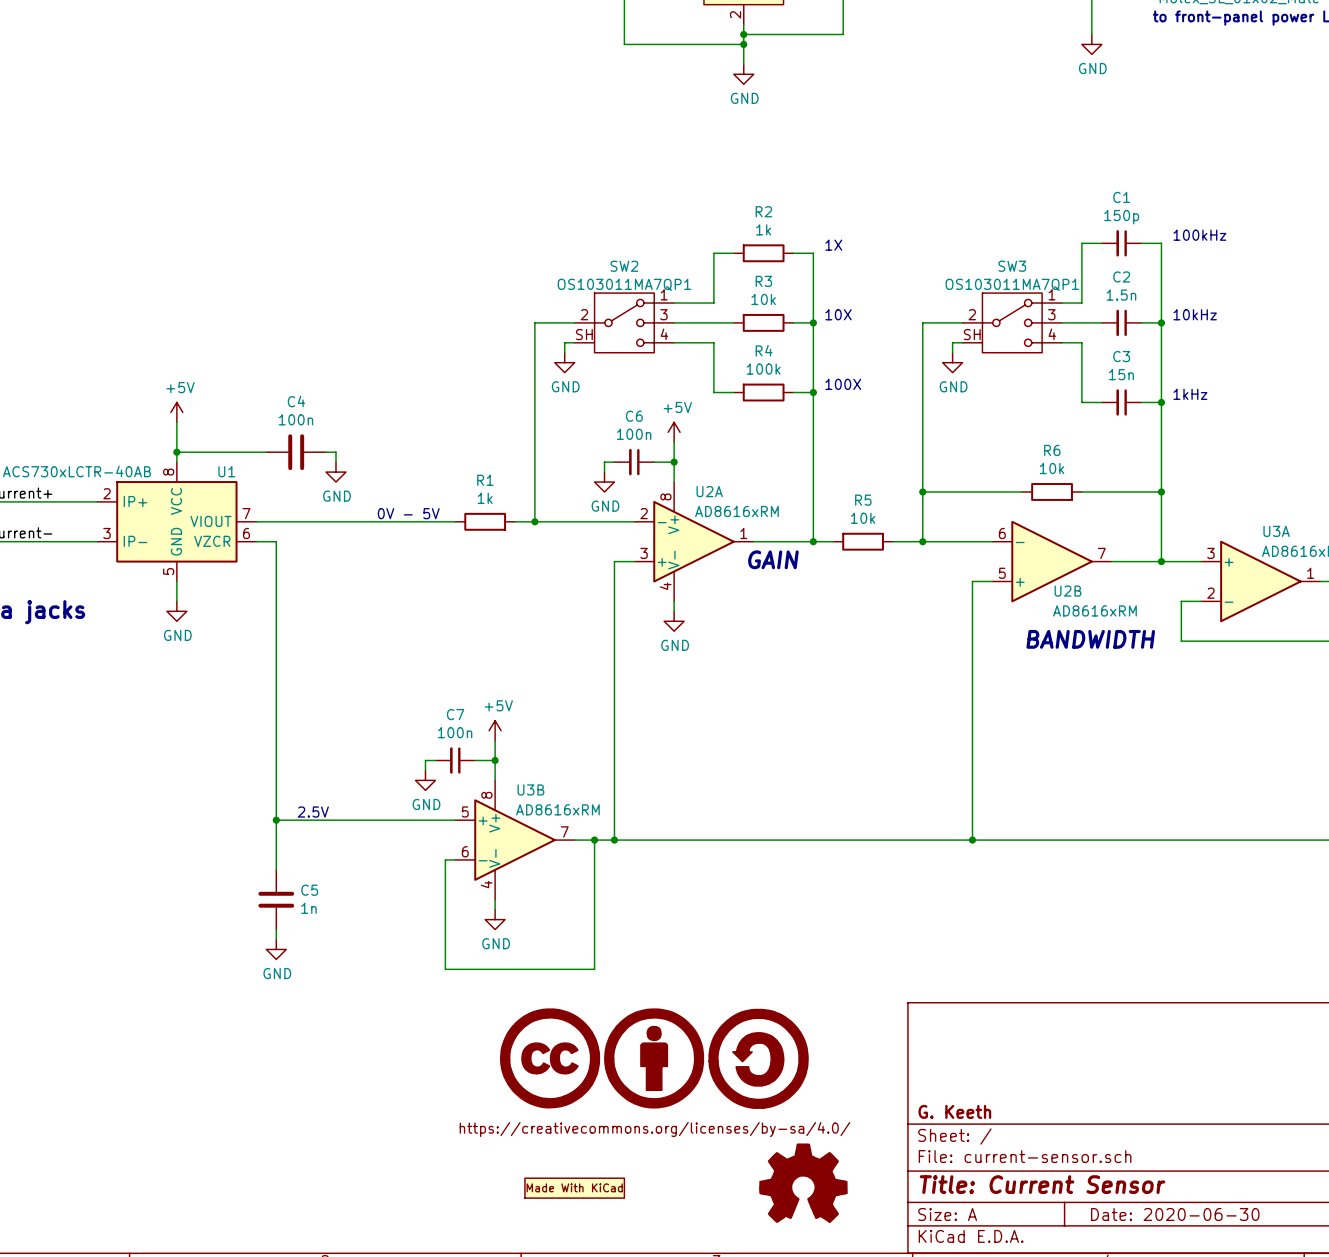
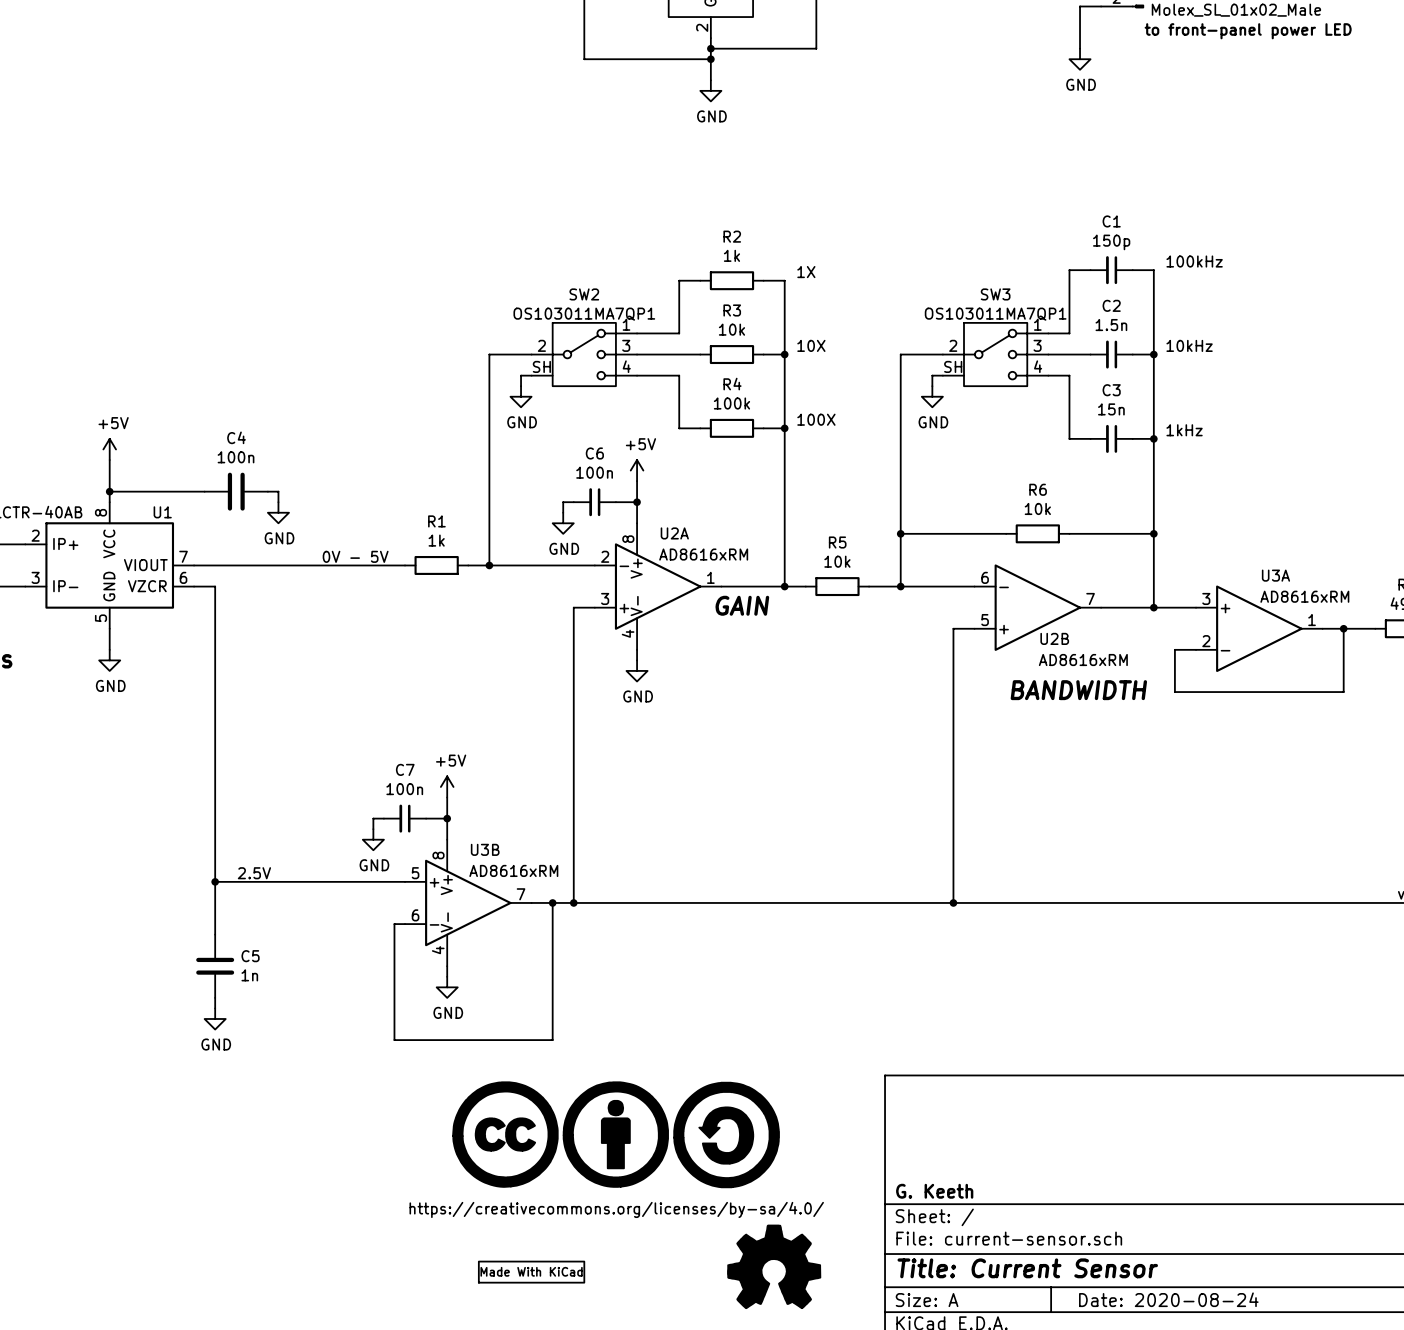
title block: Date: 2020-06-30 (1175, 1214) -> Date: 2020-08-24 (1168, 1299)

